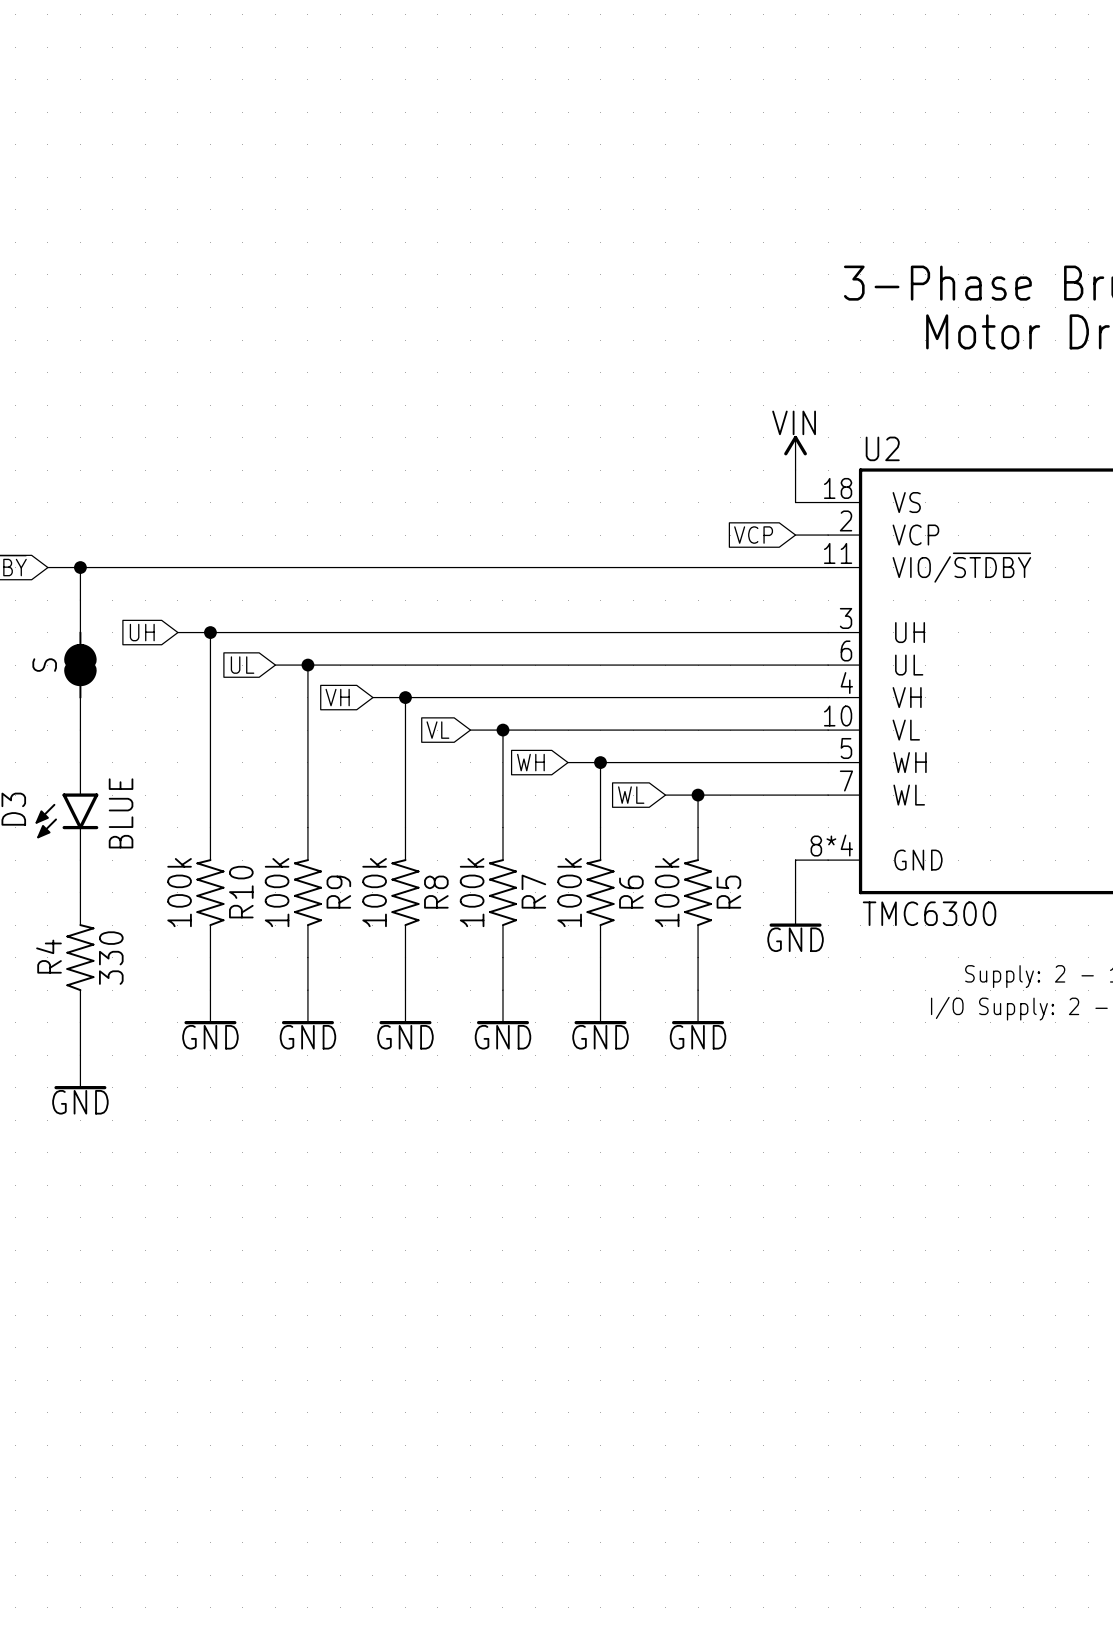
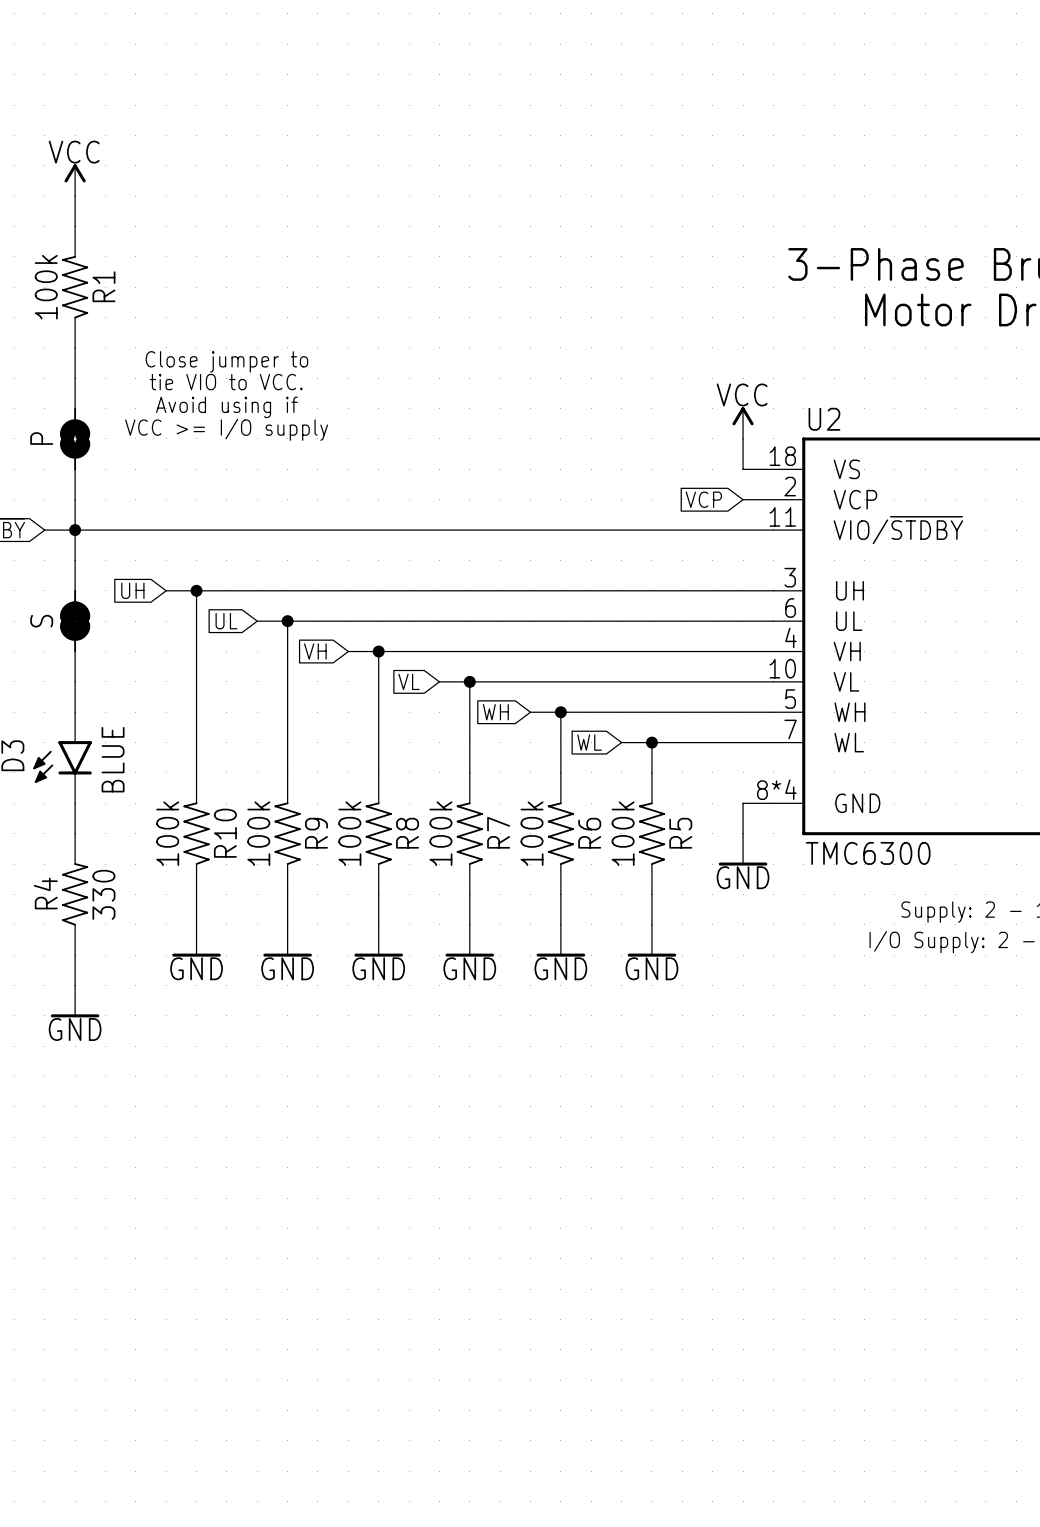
power symbol: none -> VCC (75, 180)
wire: none -> (75, 196) (75, 226)
R1: none -> 100k (75, 287)
wire: none -> (75, 347) (75, 378)
text: none -> Close jumper to (226, 361)
text: none -> tie VIO to VCC. (226, 382)
text: none -> Avoid using if (226, 407)
power symbol: VIN (795, 452) -> VCC (743, 423)
text: none -> VCC >= I/O supply (226, 429)
P: none -> (75, 438)
wire: none -> (75, 499) (75, 530)

